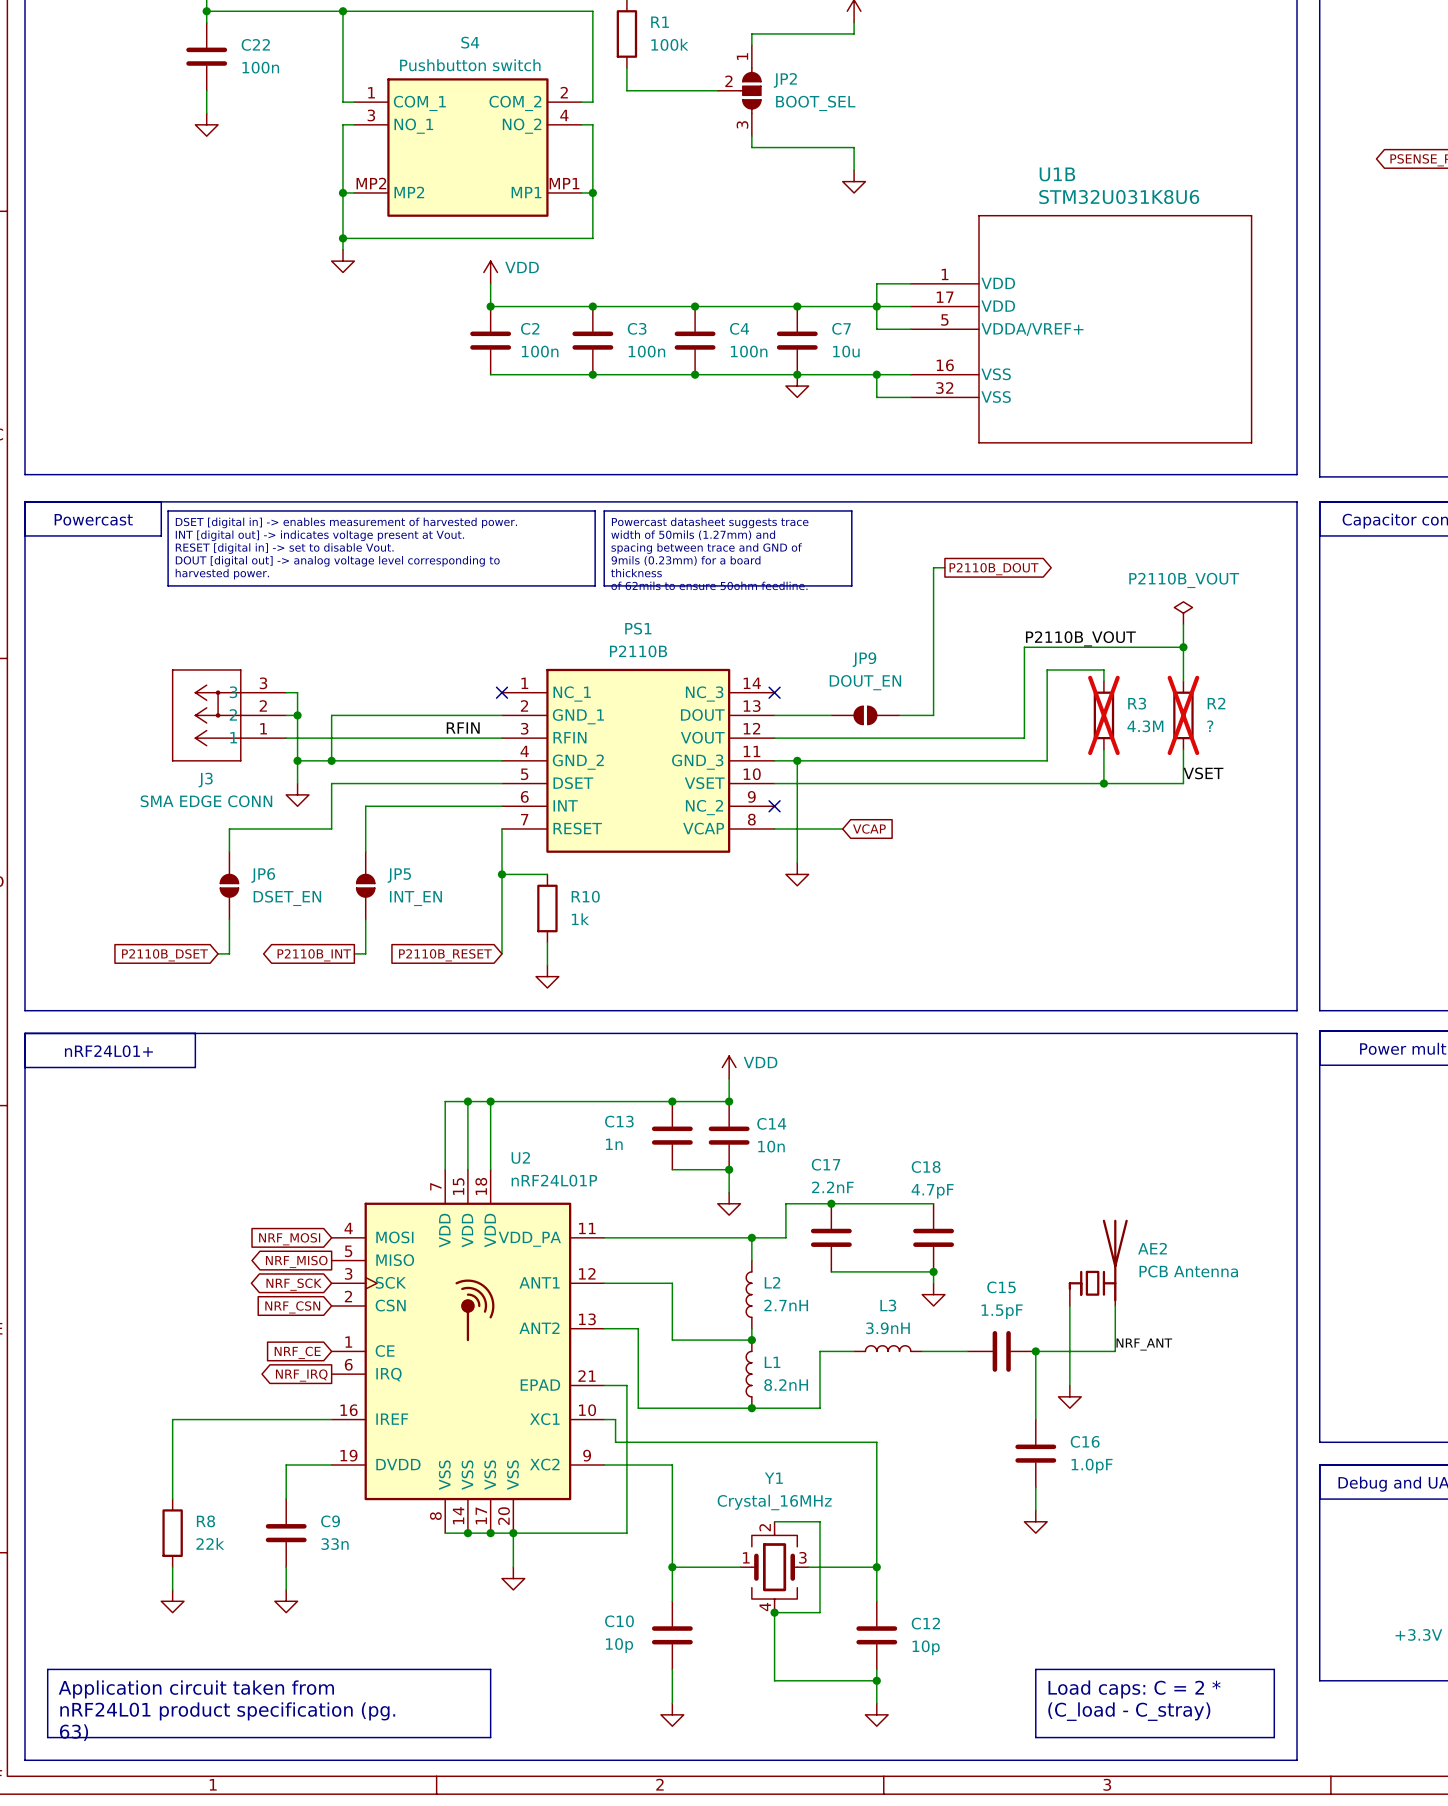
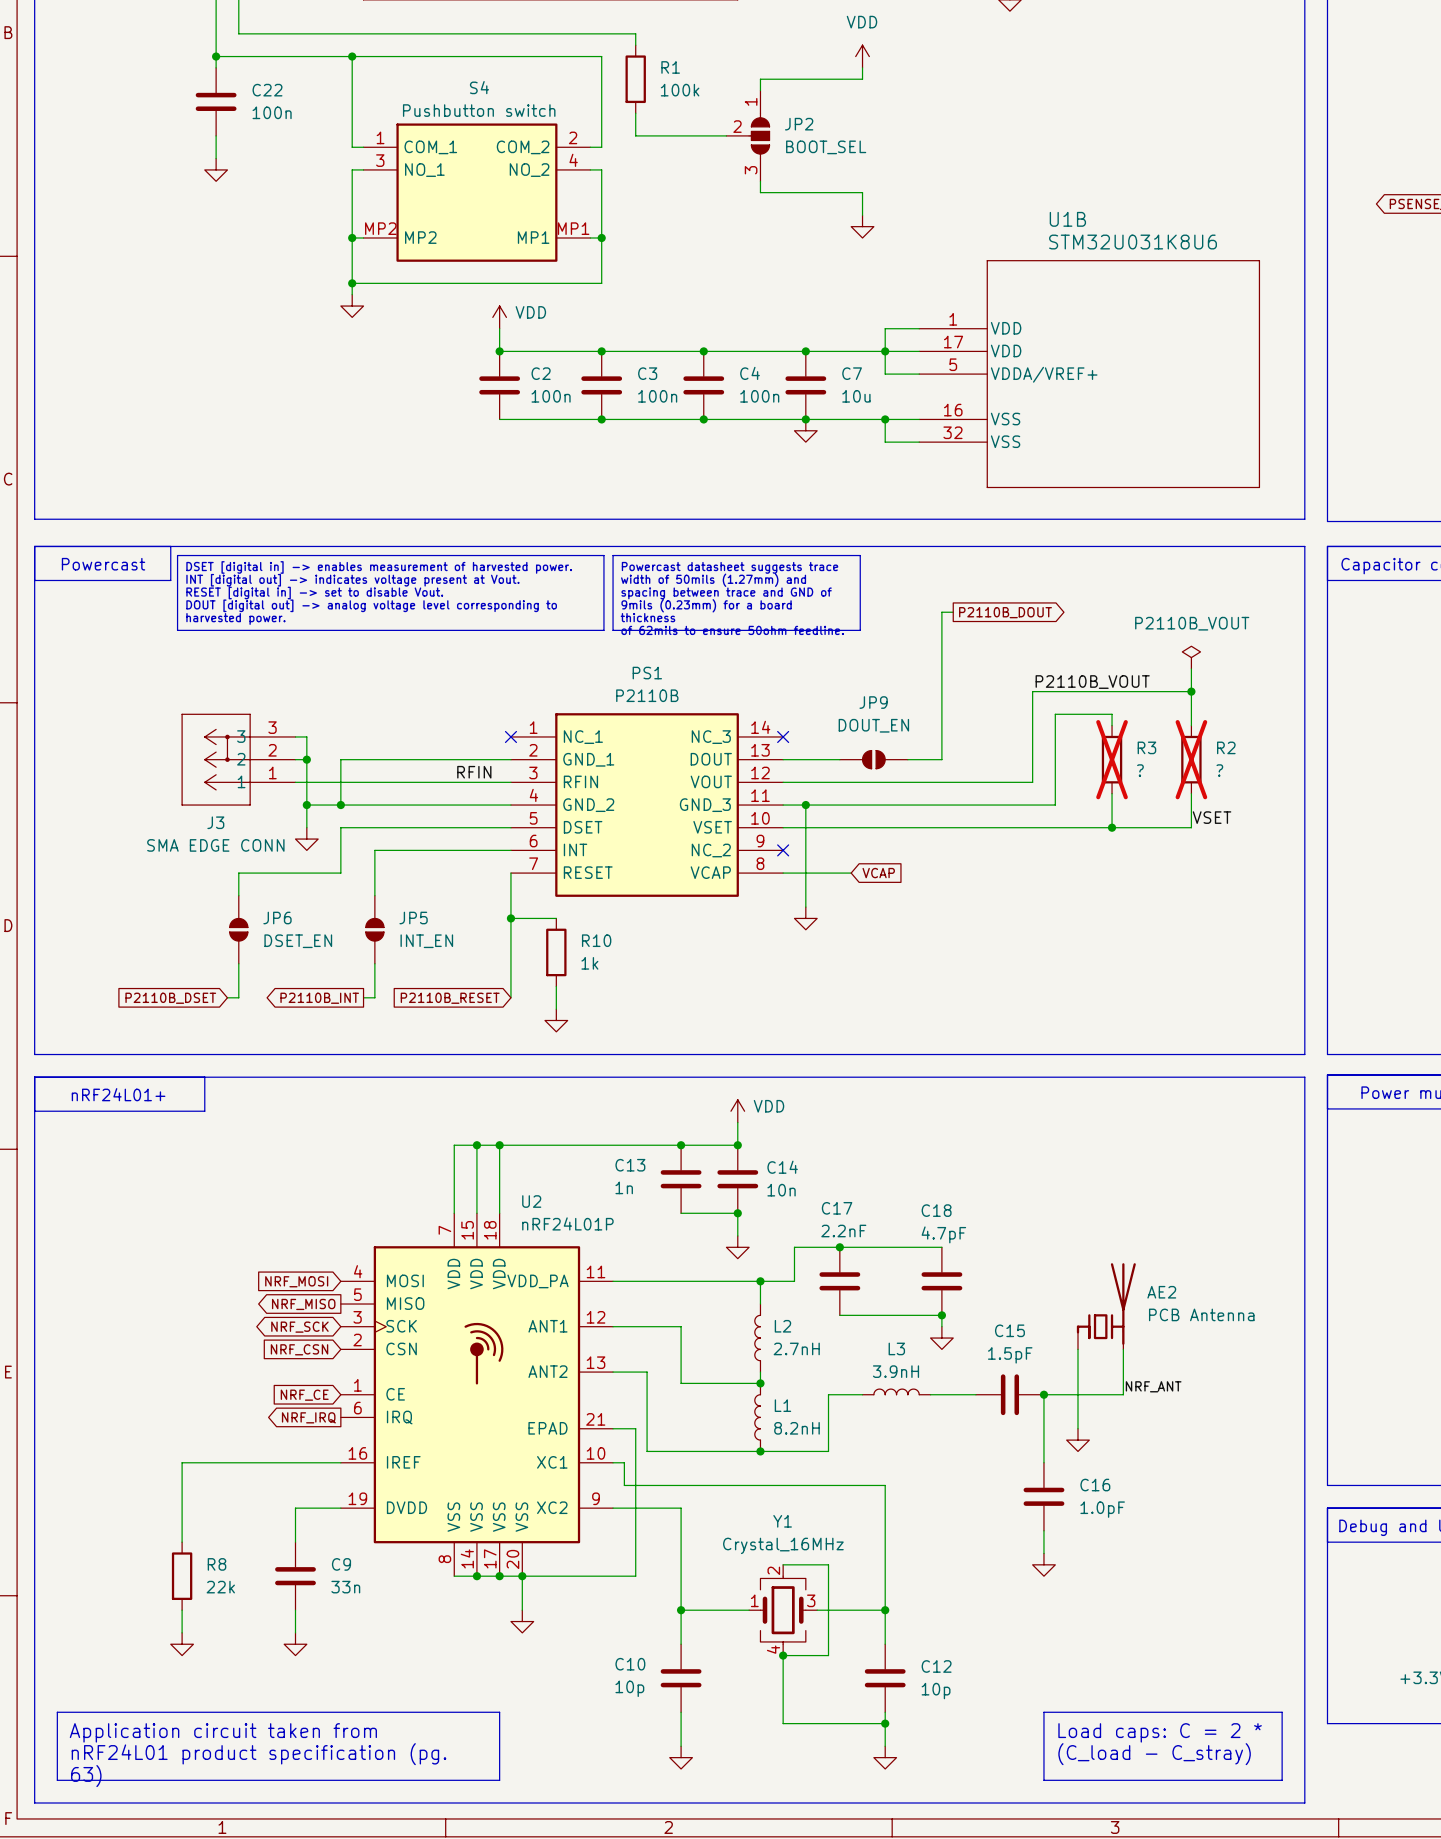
R3 value: 4.3M (1145, 726) -> ? (1140, 770)

